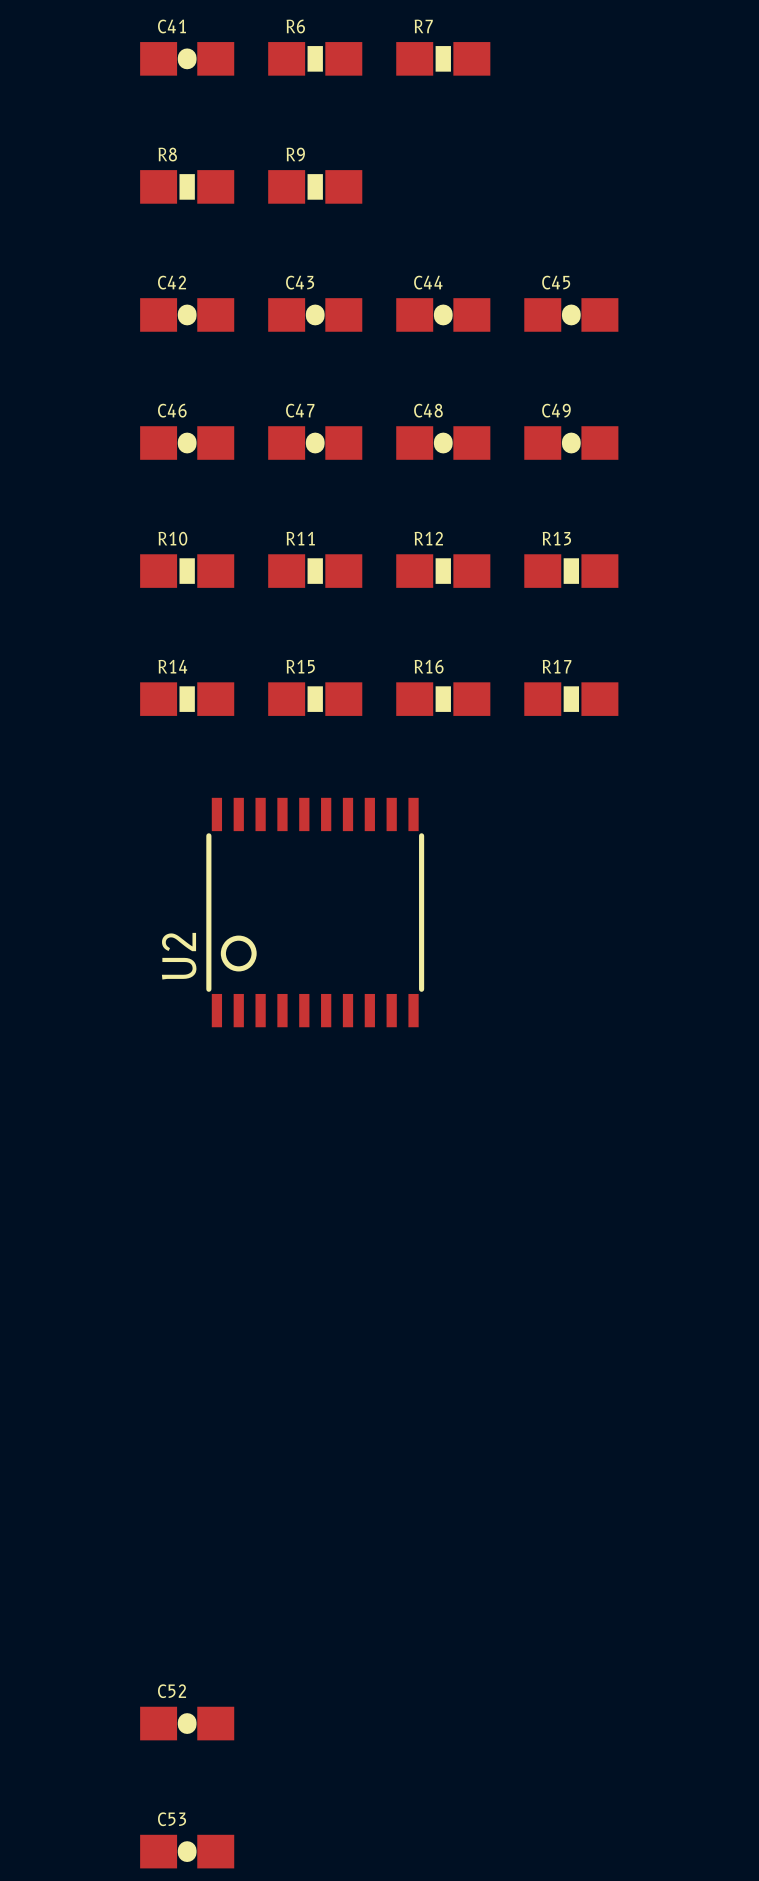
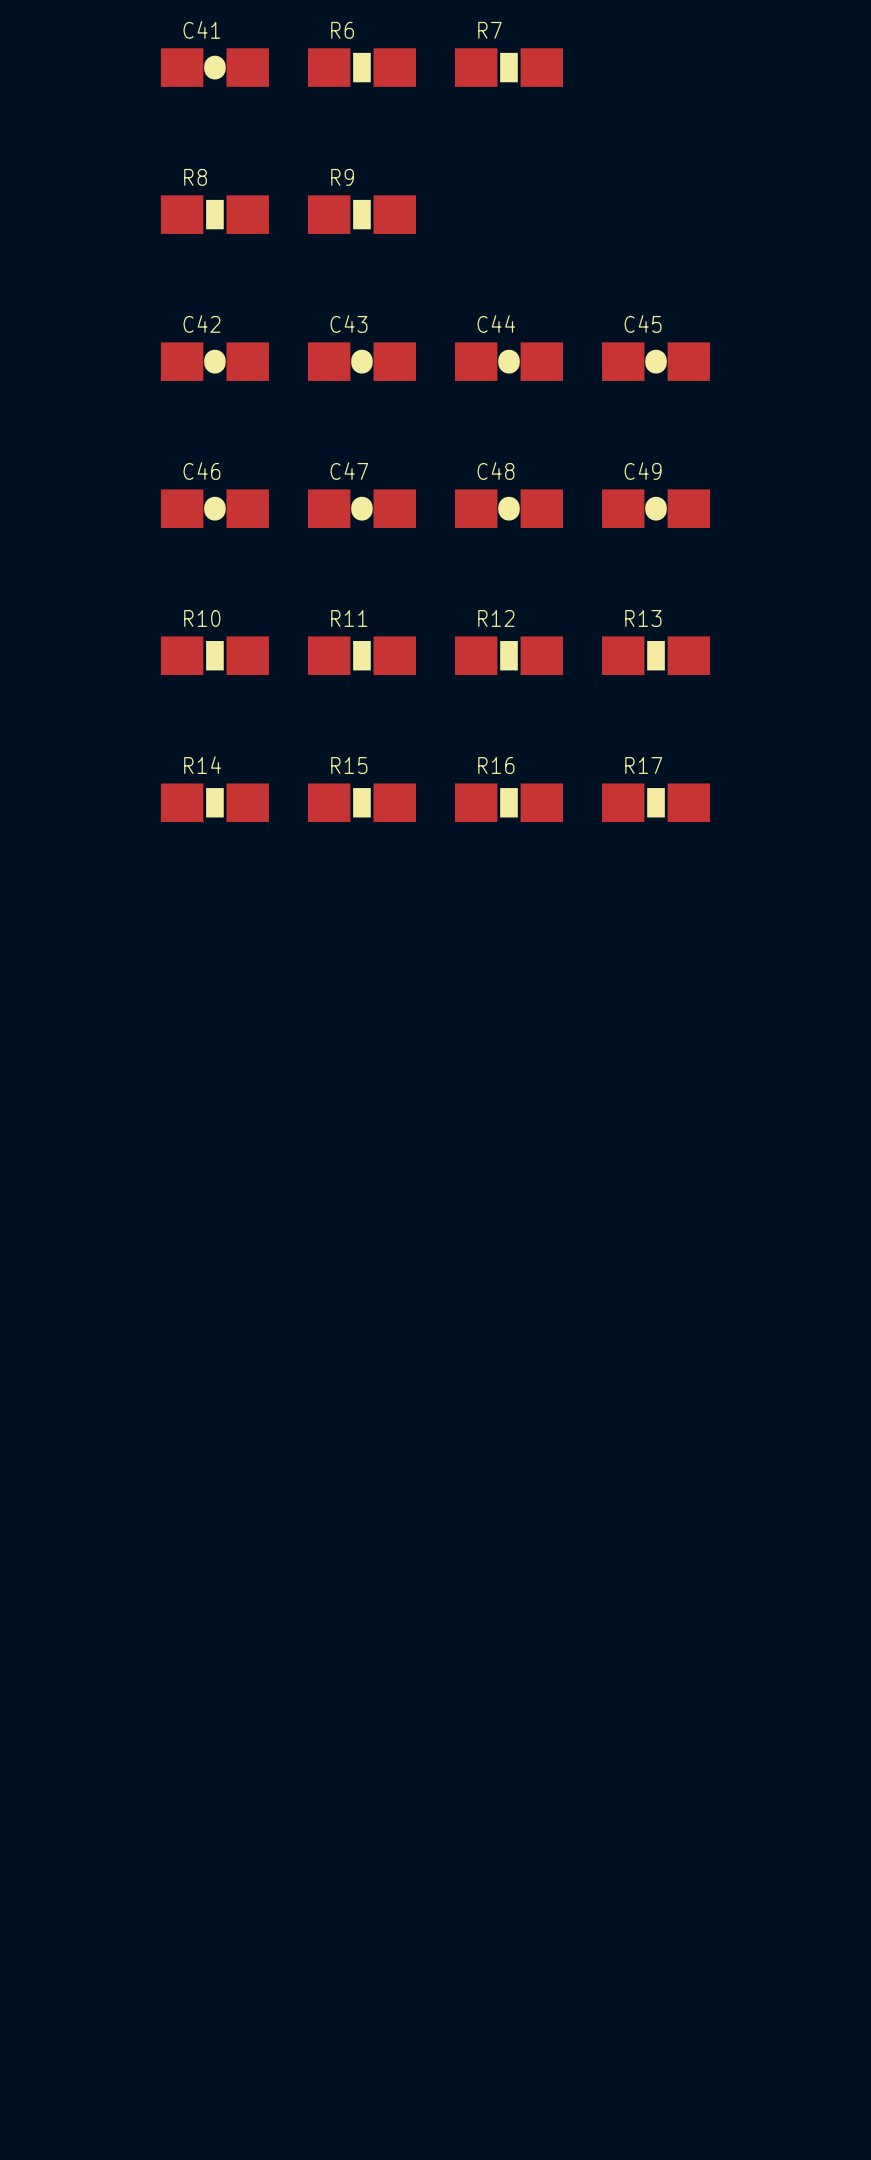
U2: (315, 912) -> none
C52: (187, 1723) -> none
C53: (187, 1851) -> none

